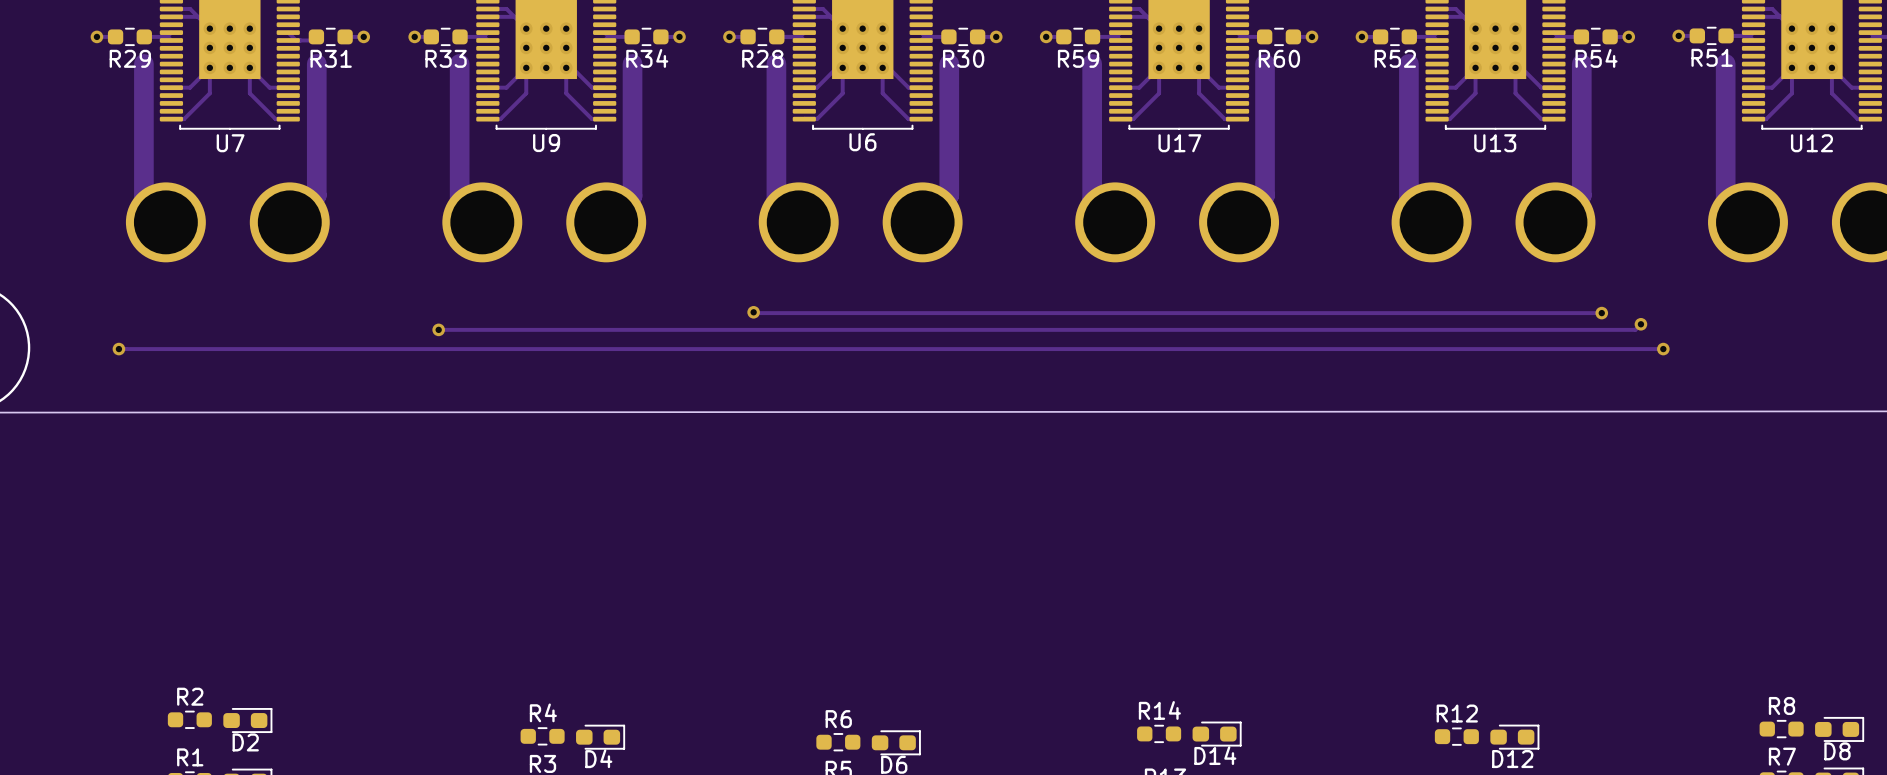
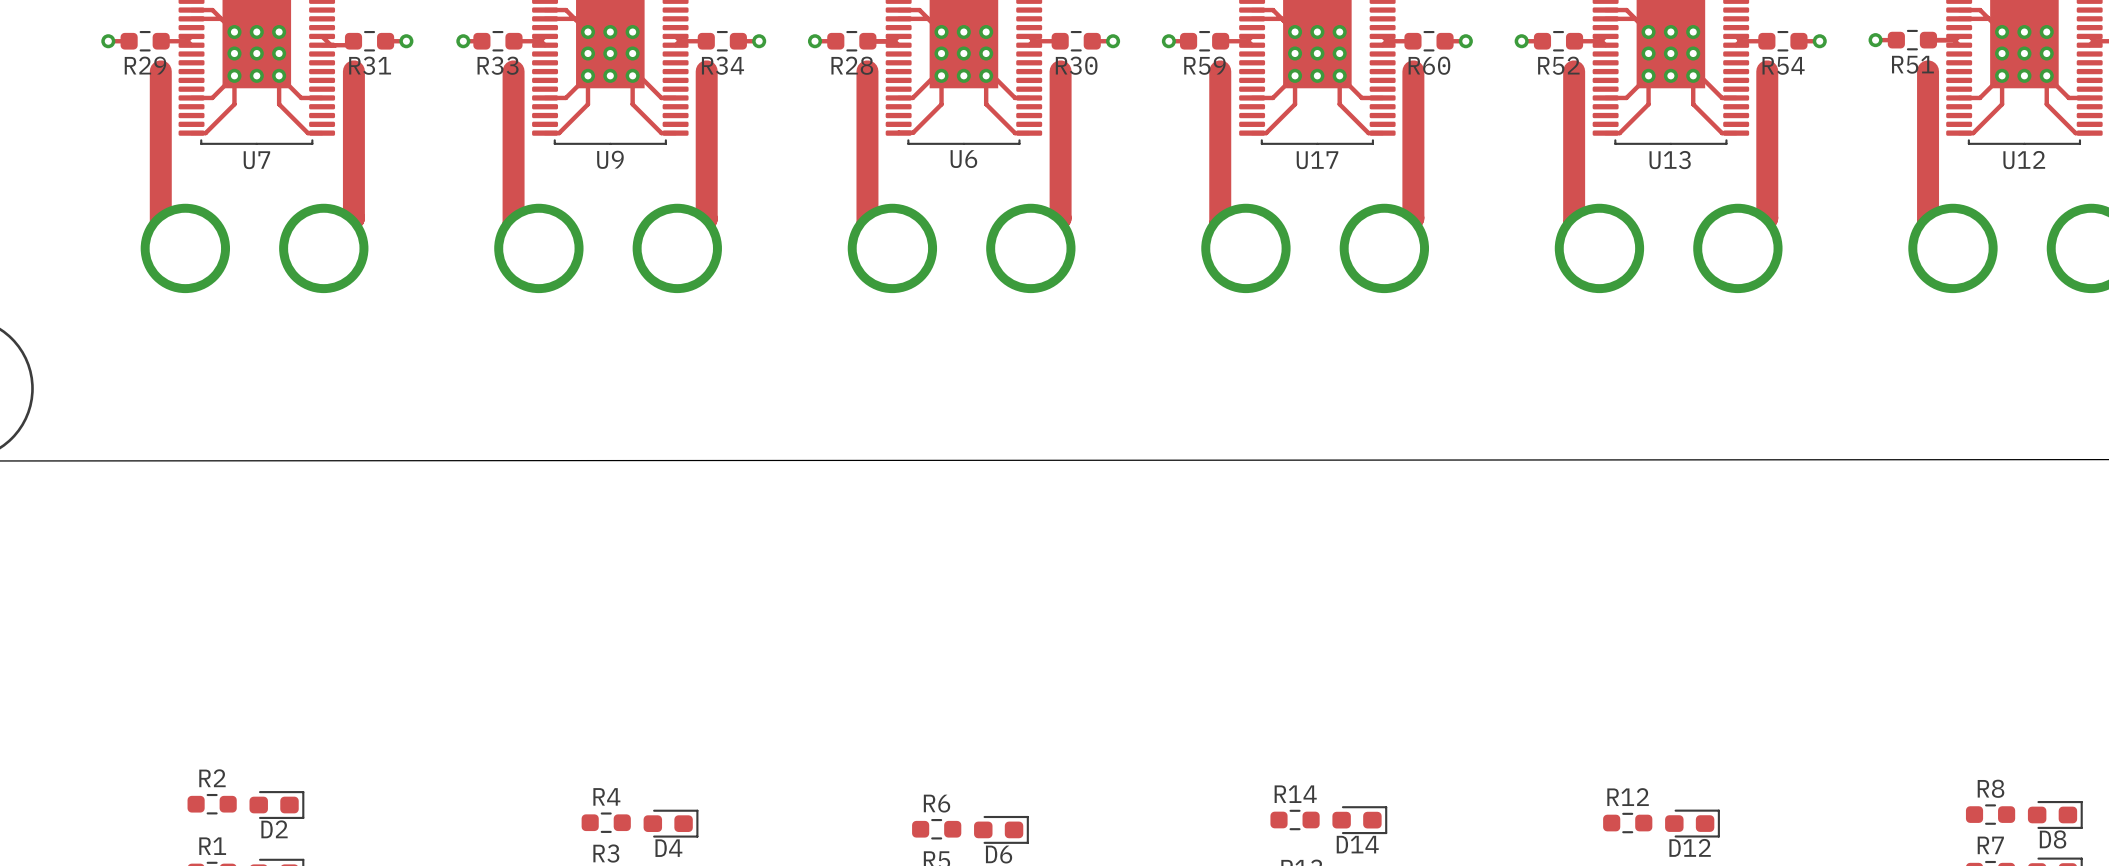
track: (753, 312) (1601, 313) -> none
via: (753, 312) -> none
via: (1601, 313) -> none
track: (1640, 324) (1635, 329) (438, 329) -> none
via: (1640, 324) -> none
via: (438, 329) -> none
track: (118, 349) (1663, 349) -> none
via: (118, 349) -> none
via: (1663, 349) -> none

